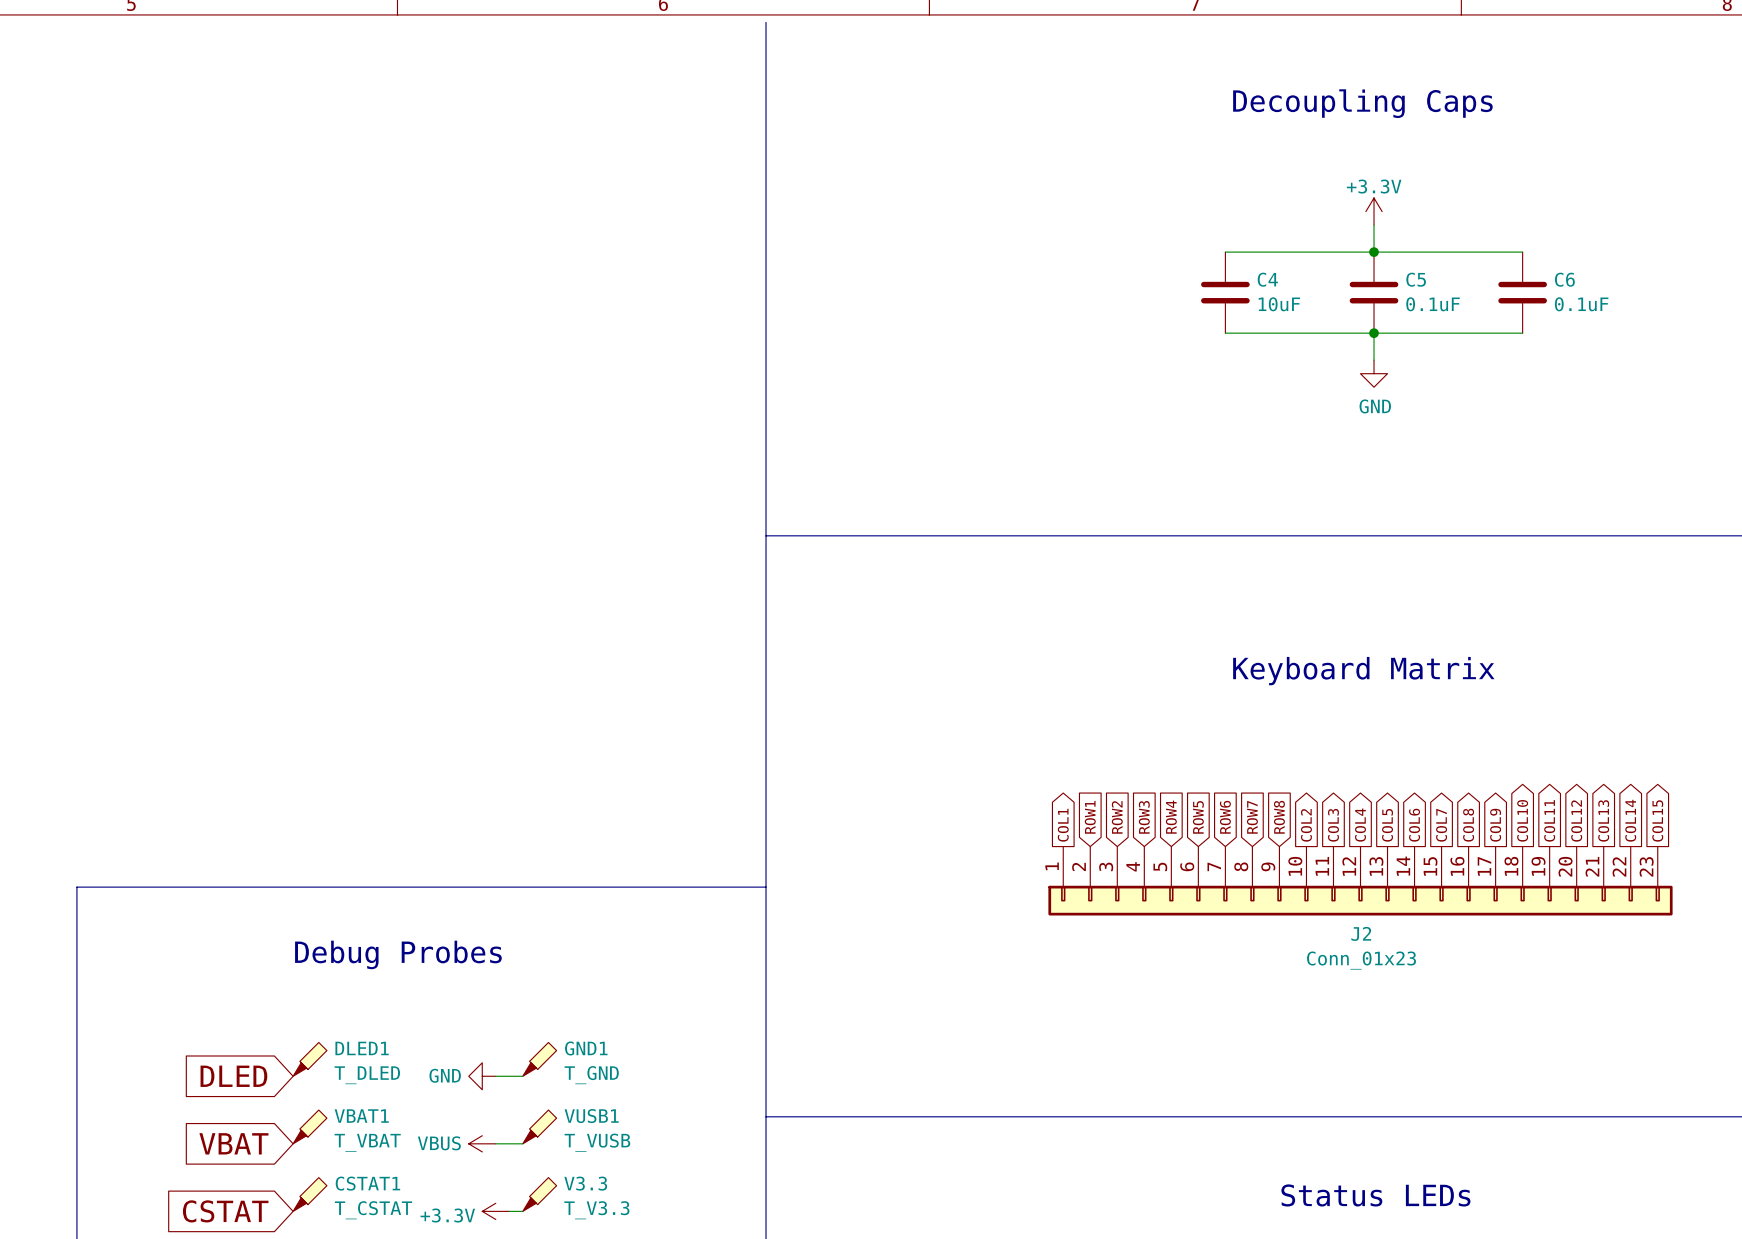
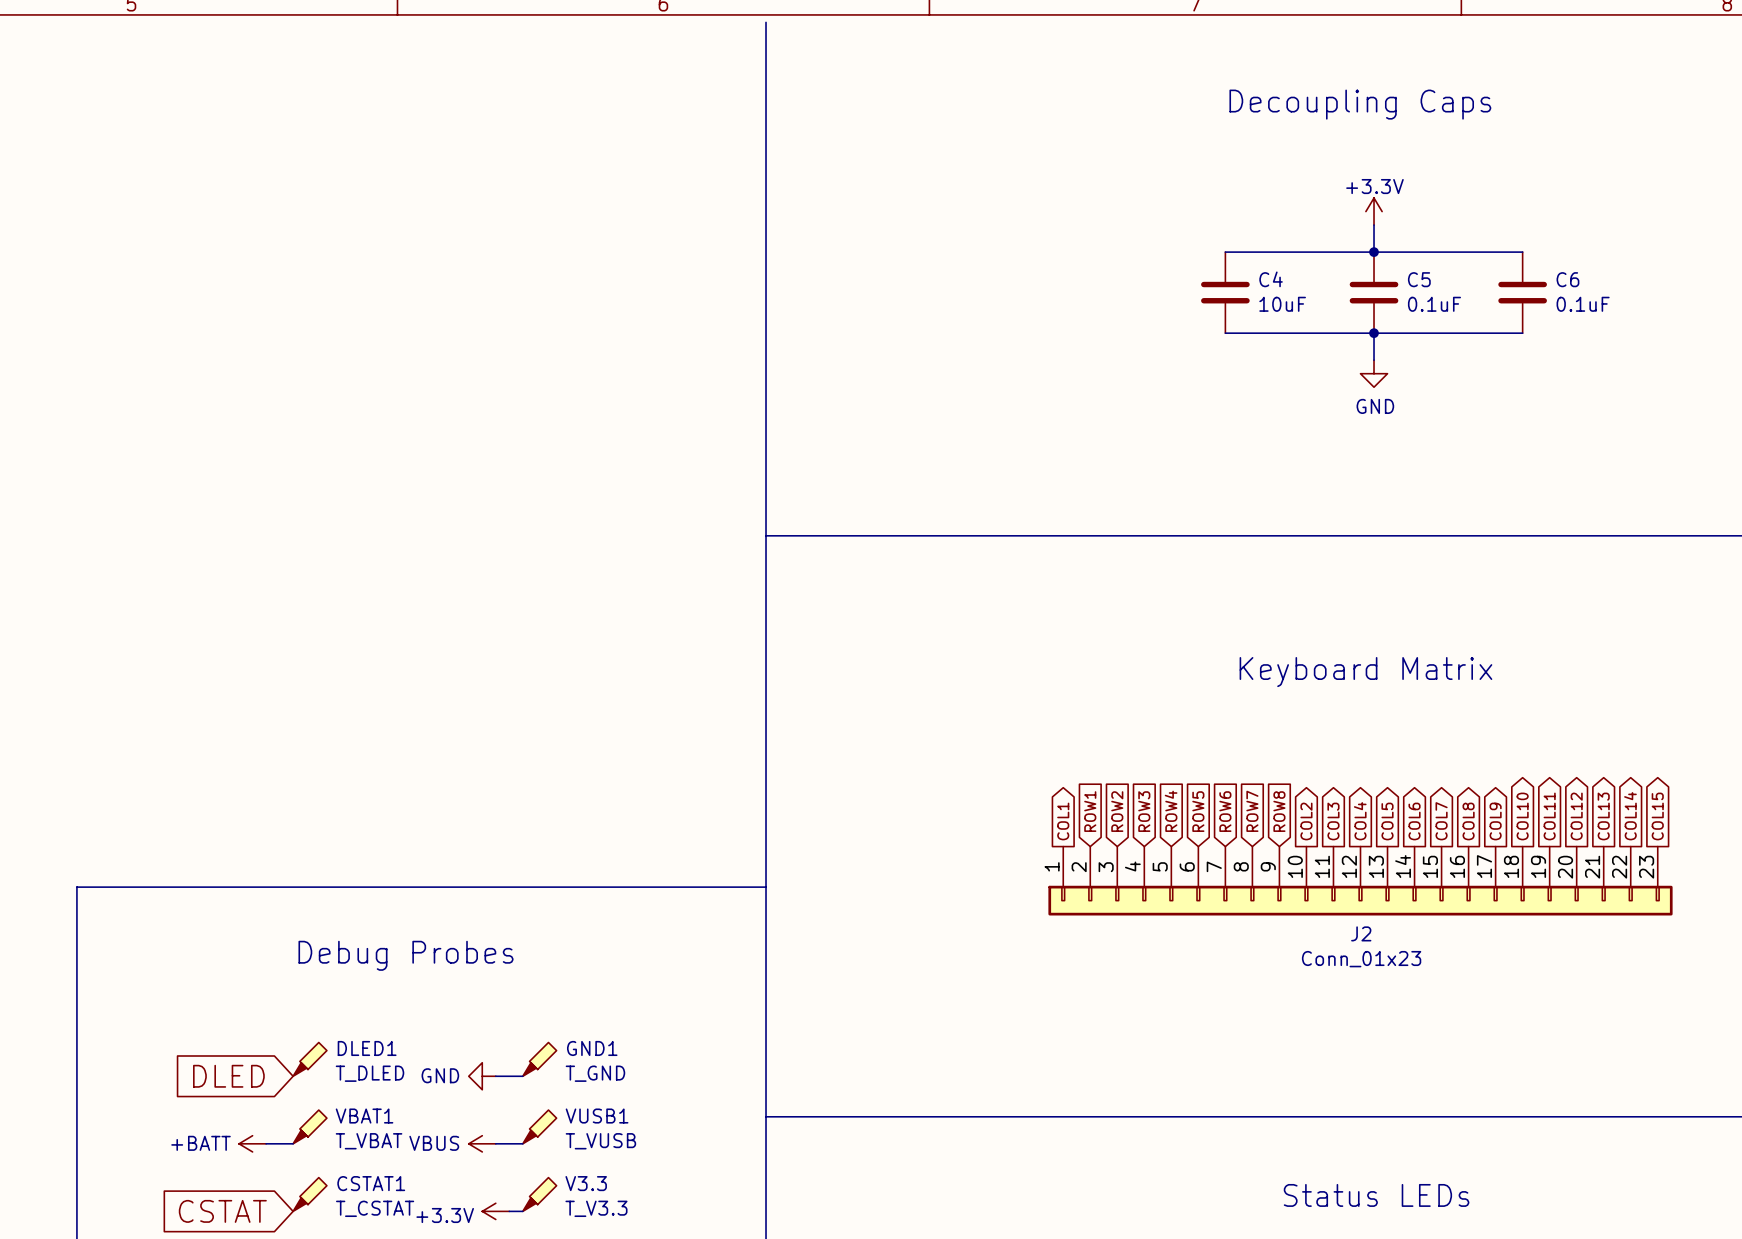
global label: VBAT (233, 1143) -> none
power symbol: none -> +BATT (252, 1143)
wire: none -> (266, 1143) (293, 1143)

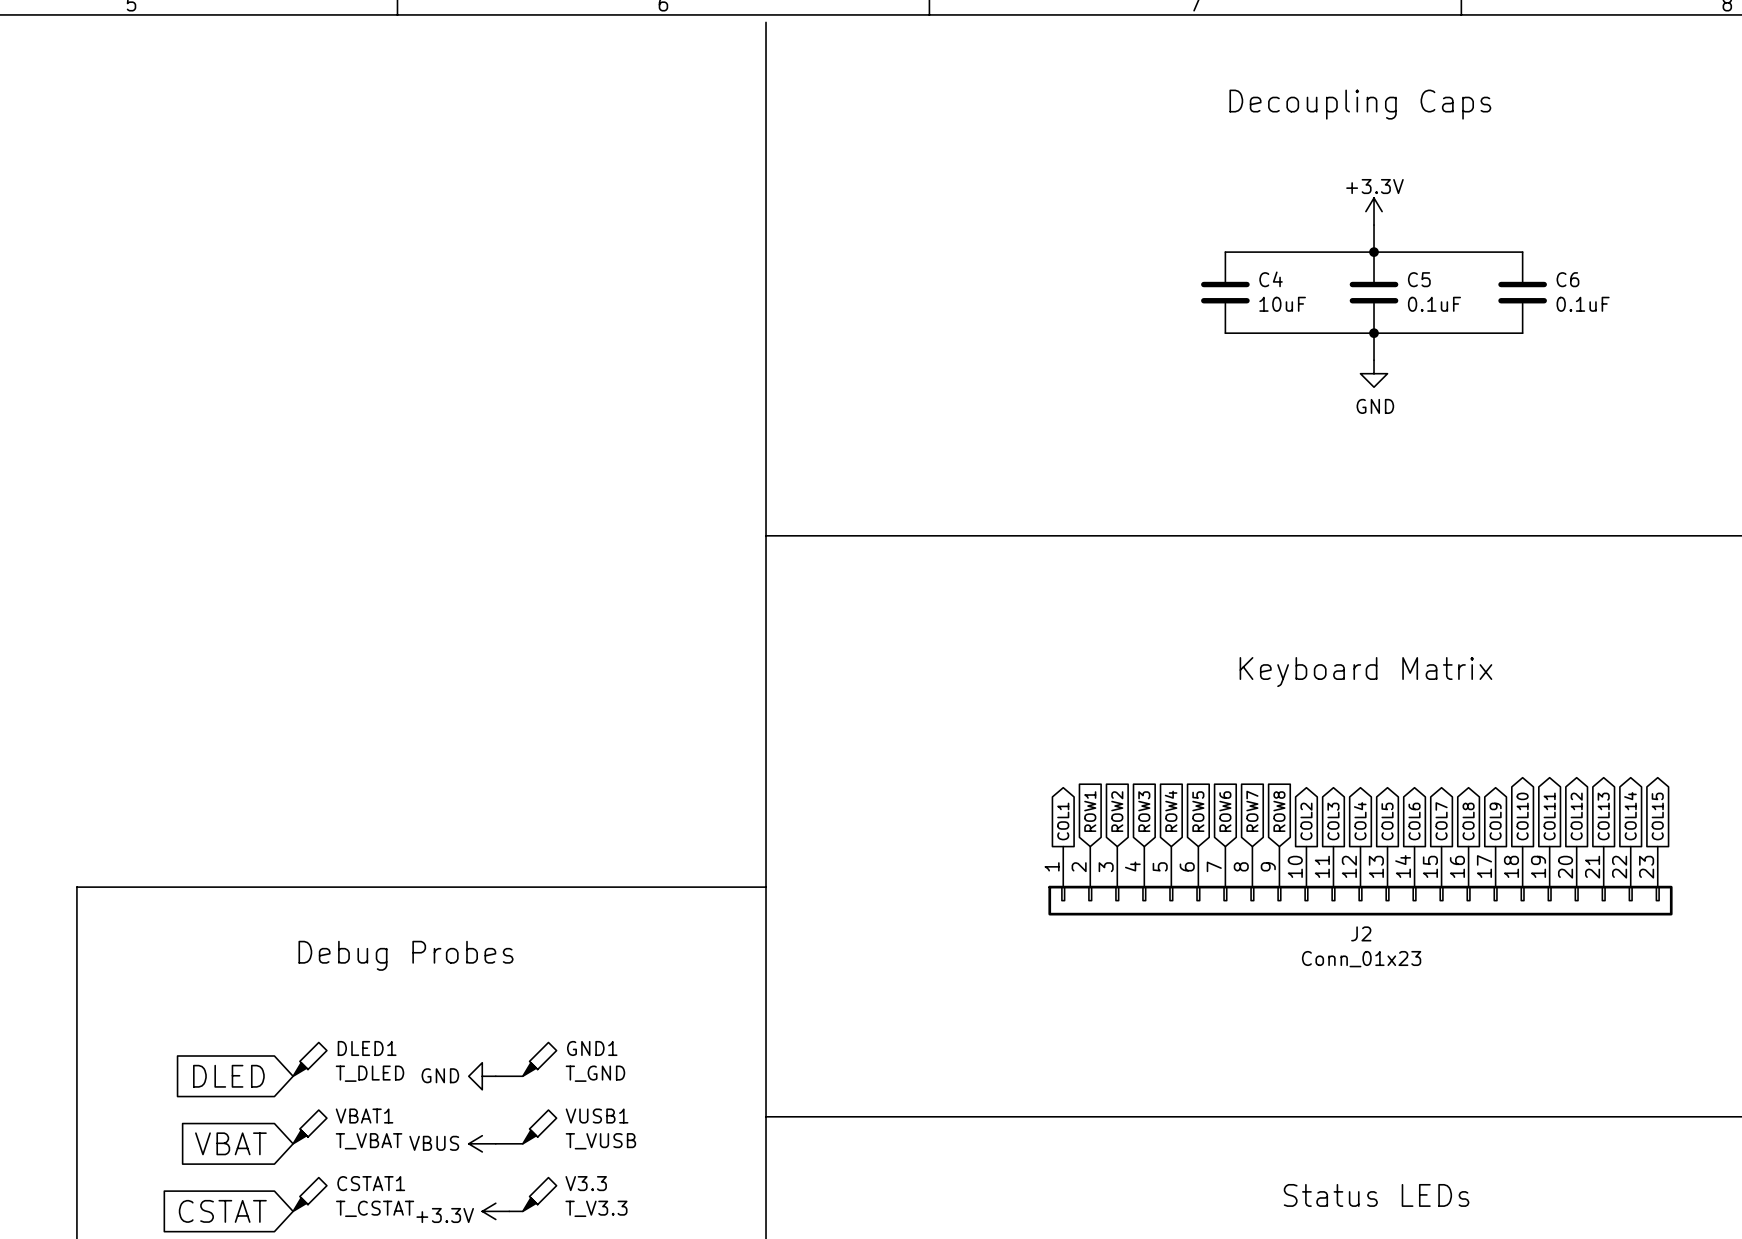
global label: none -> VBAT (230, 1143)
power symbol: +BATT (252, 1143) -> none
wire: (266, 1143) (293, 1143) -> none

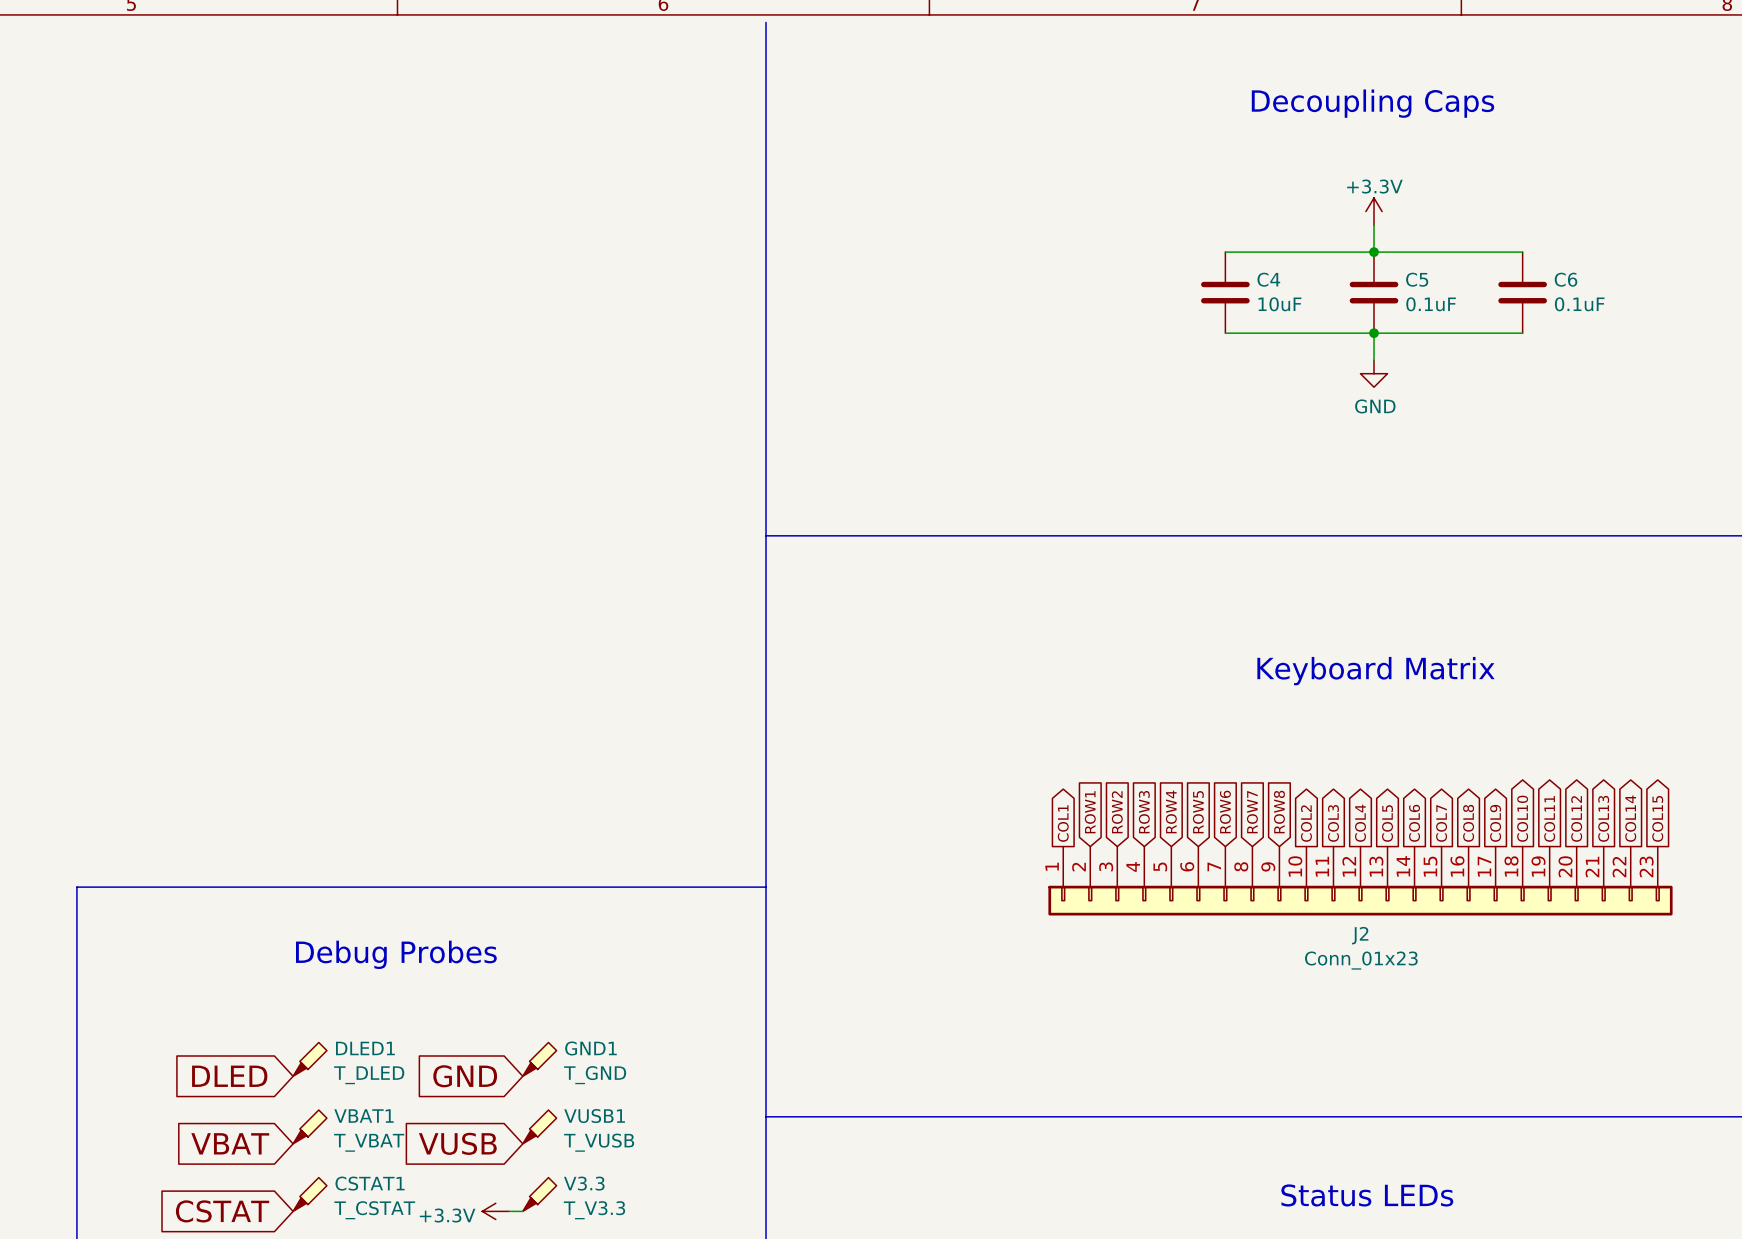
global label: none -> GND (465, 1076)
power symbol: GND (482, 1076) -> none
wire: (495, 1076) (522, 1076) -> none
global label: none -> VUSB (457, 1143)
power symbol: VBUS (482, 1143) -> none
wire: (495, 1143) (522, 1143) -> none

